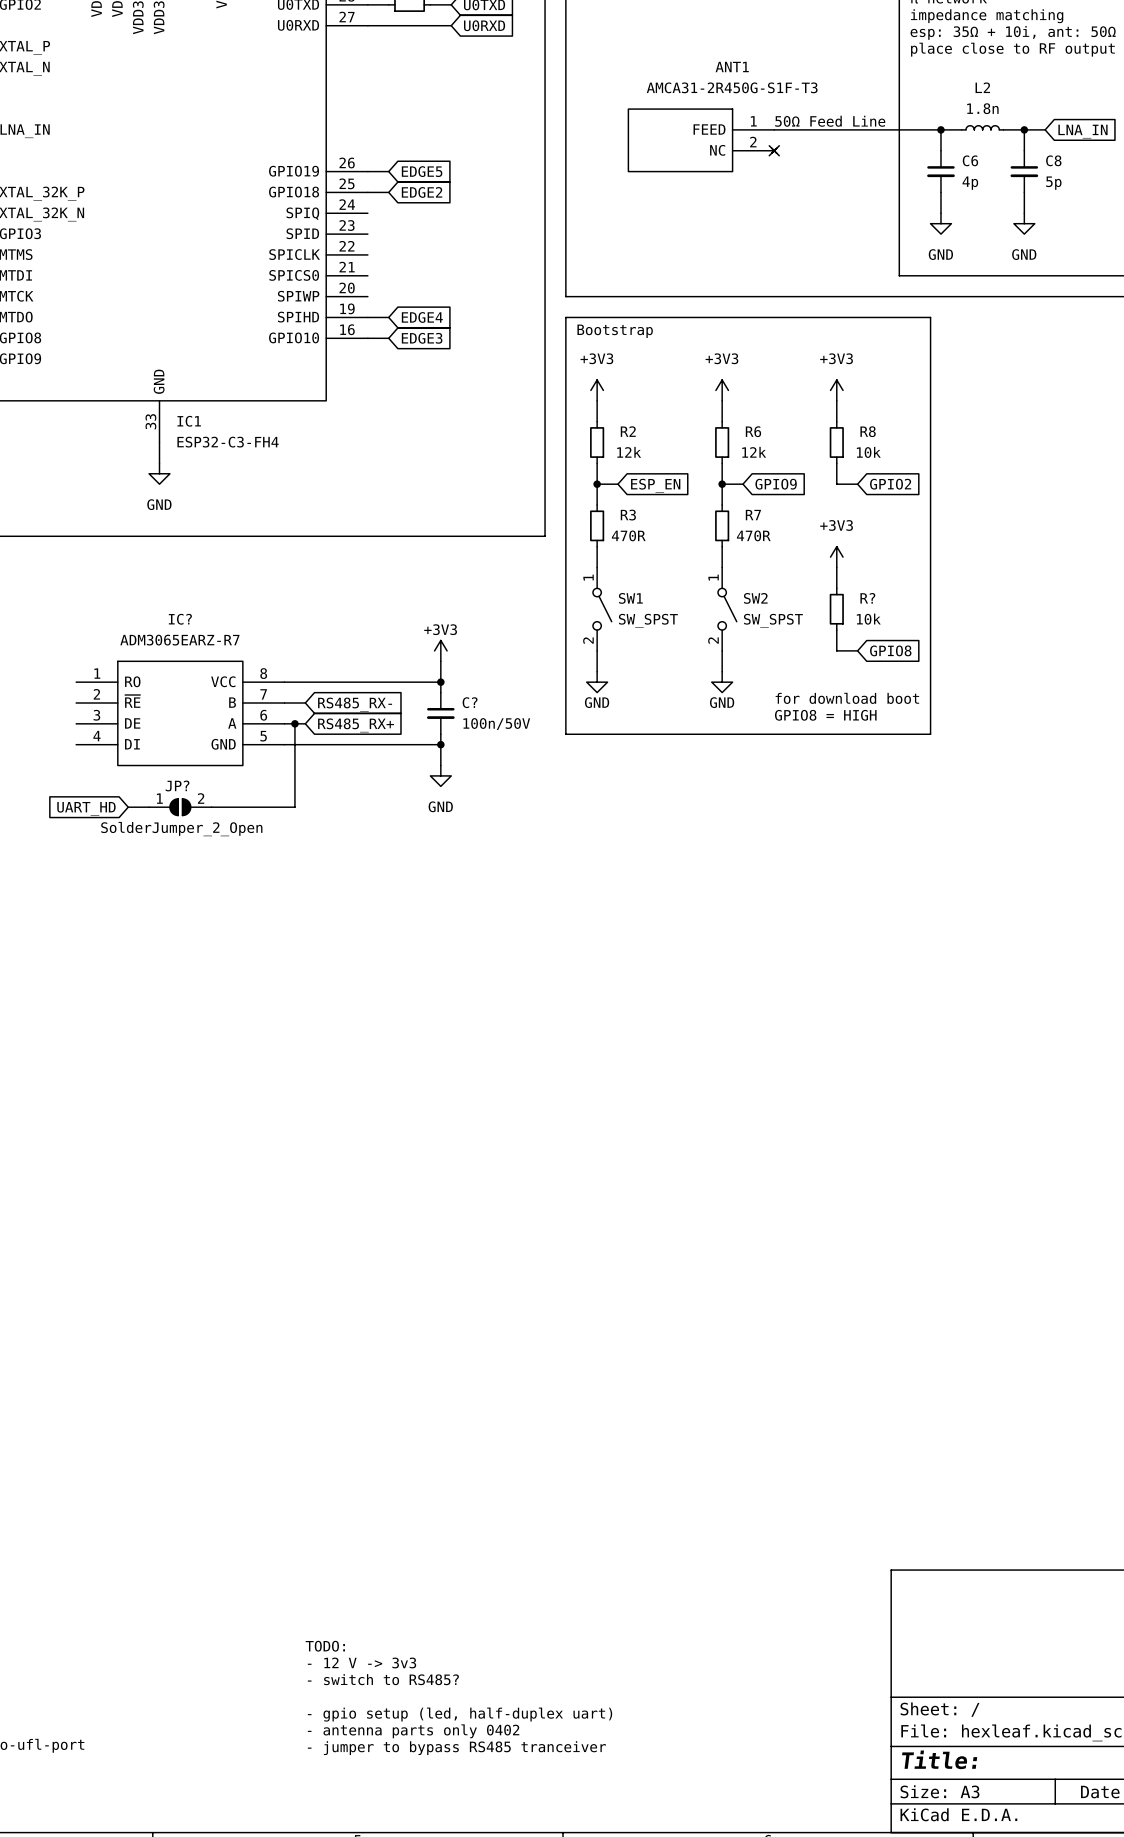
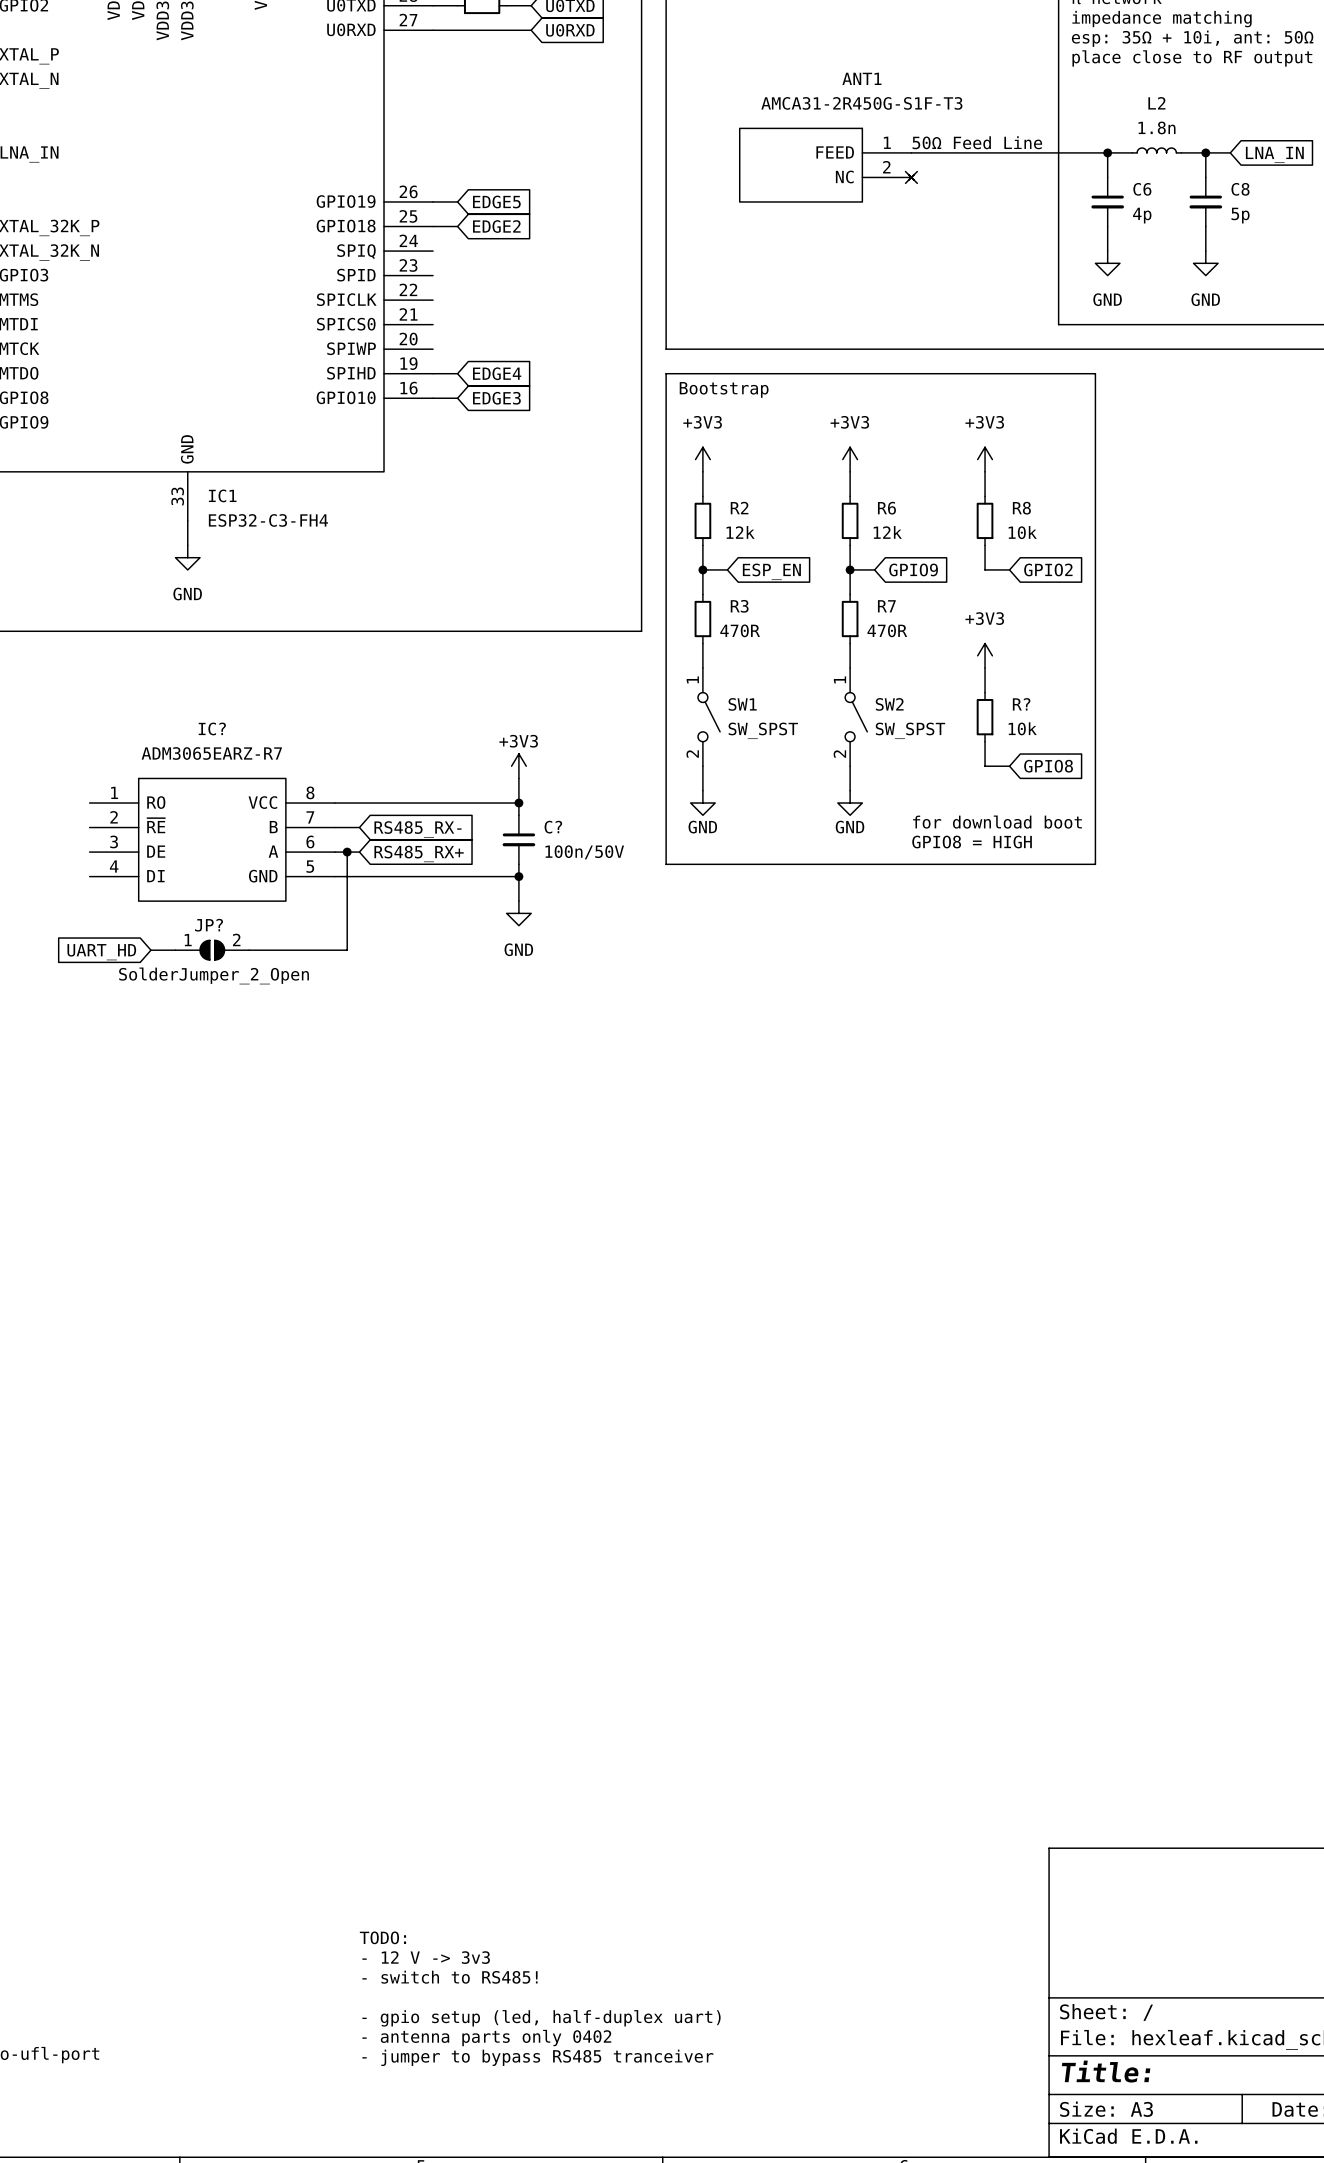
text: - switch to RS485? (383, 1679) -> - switch to RS485! (449, 1977)

